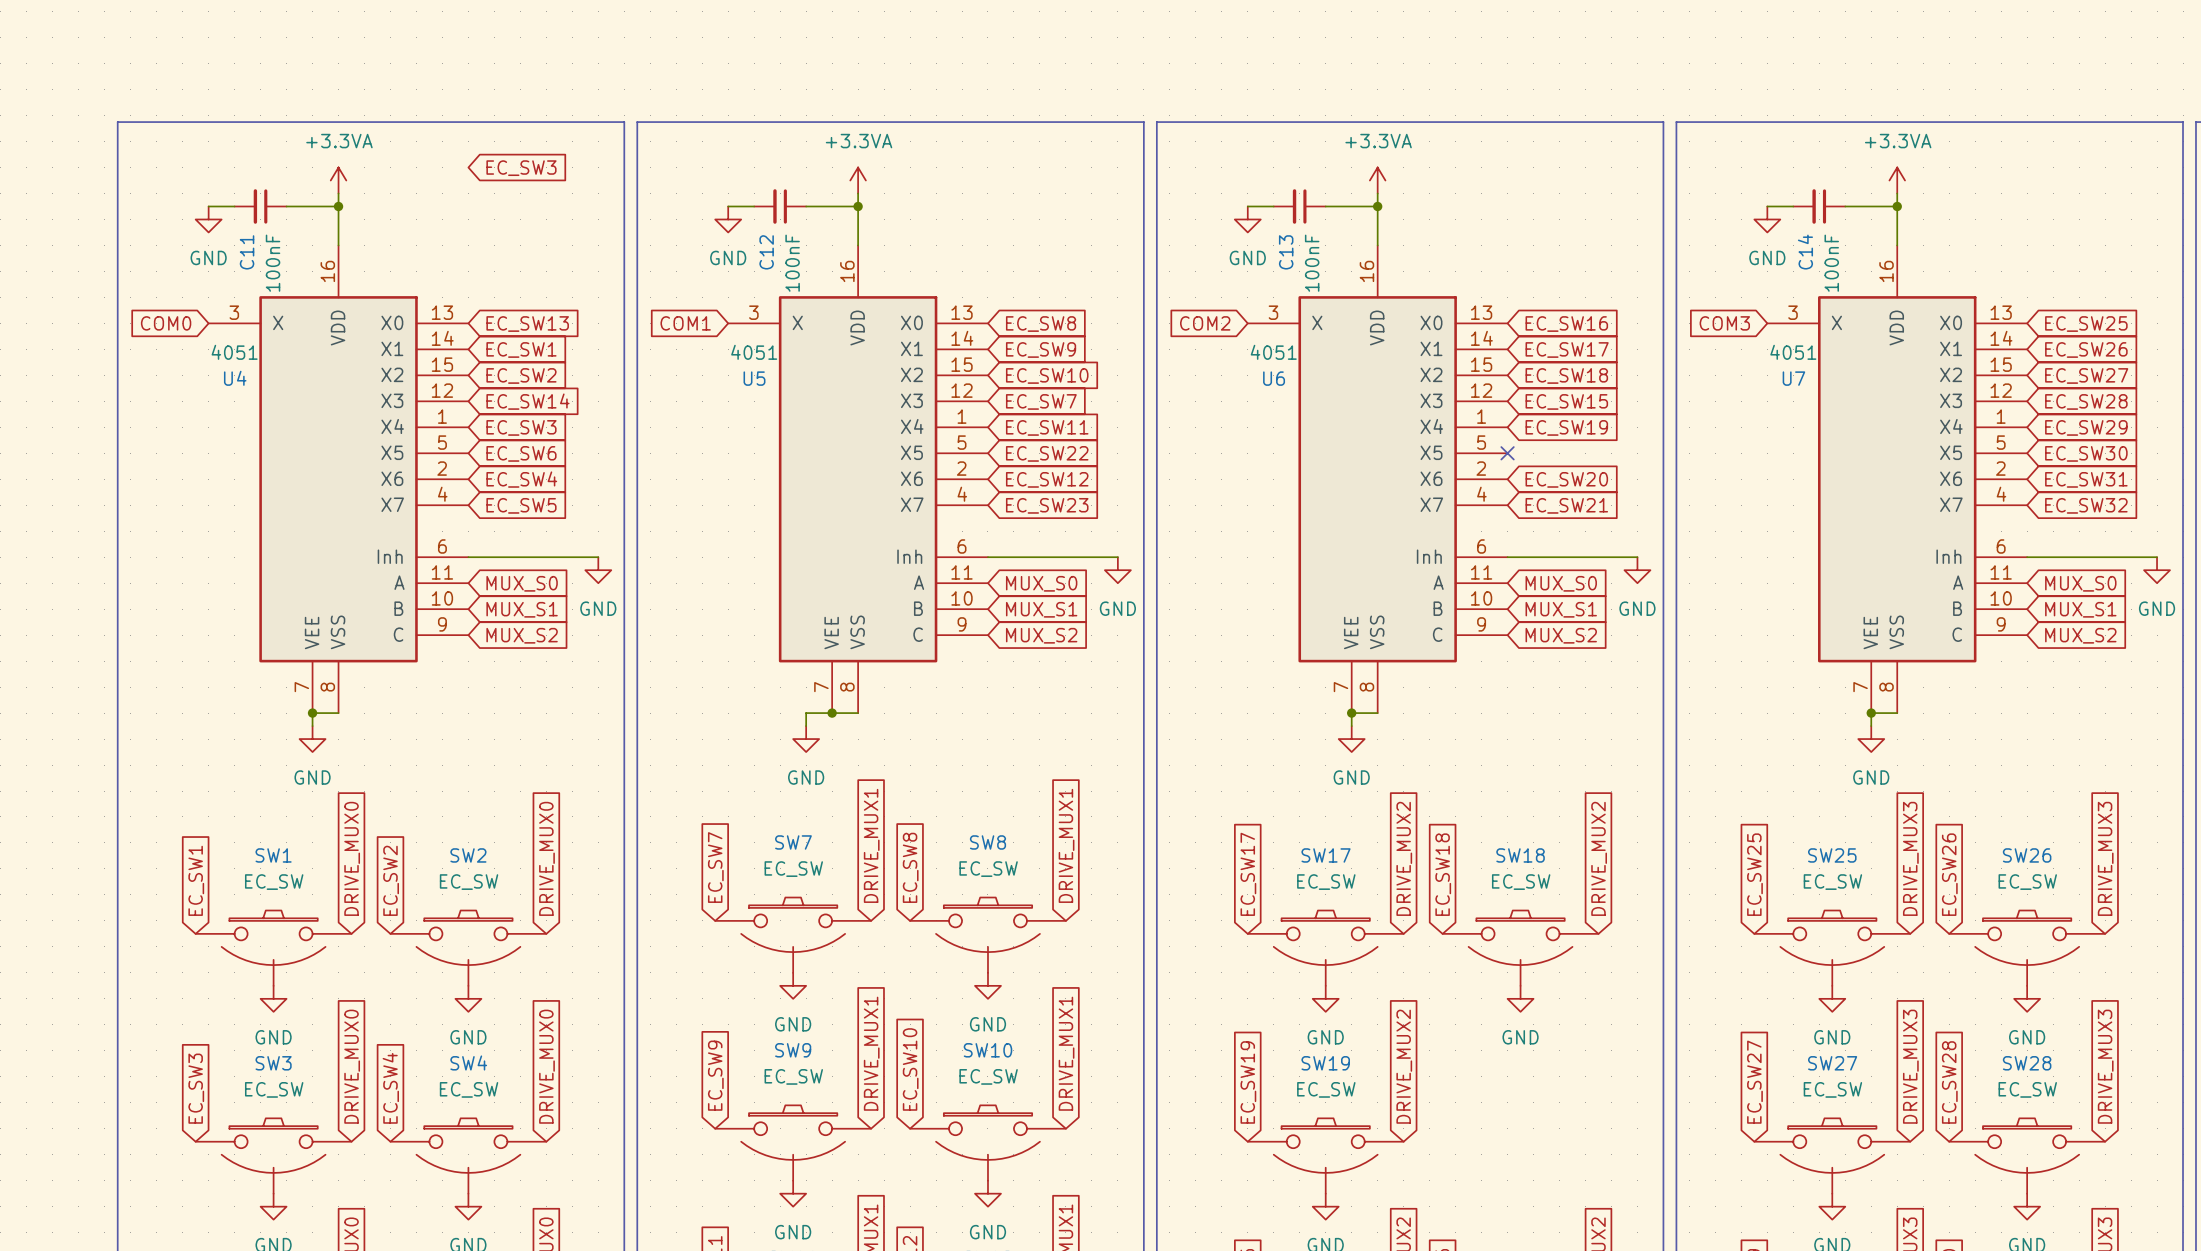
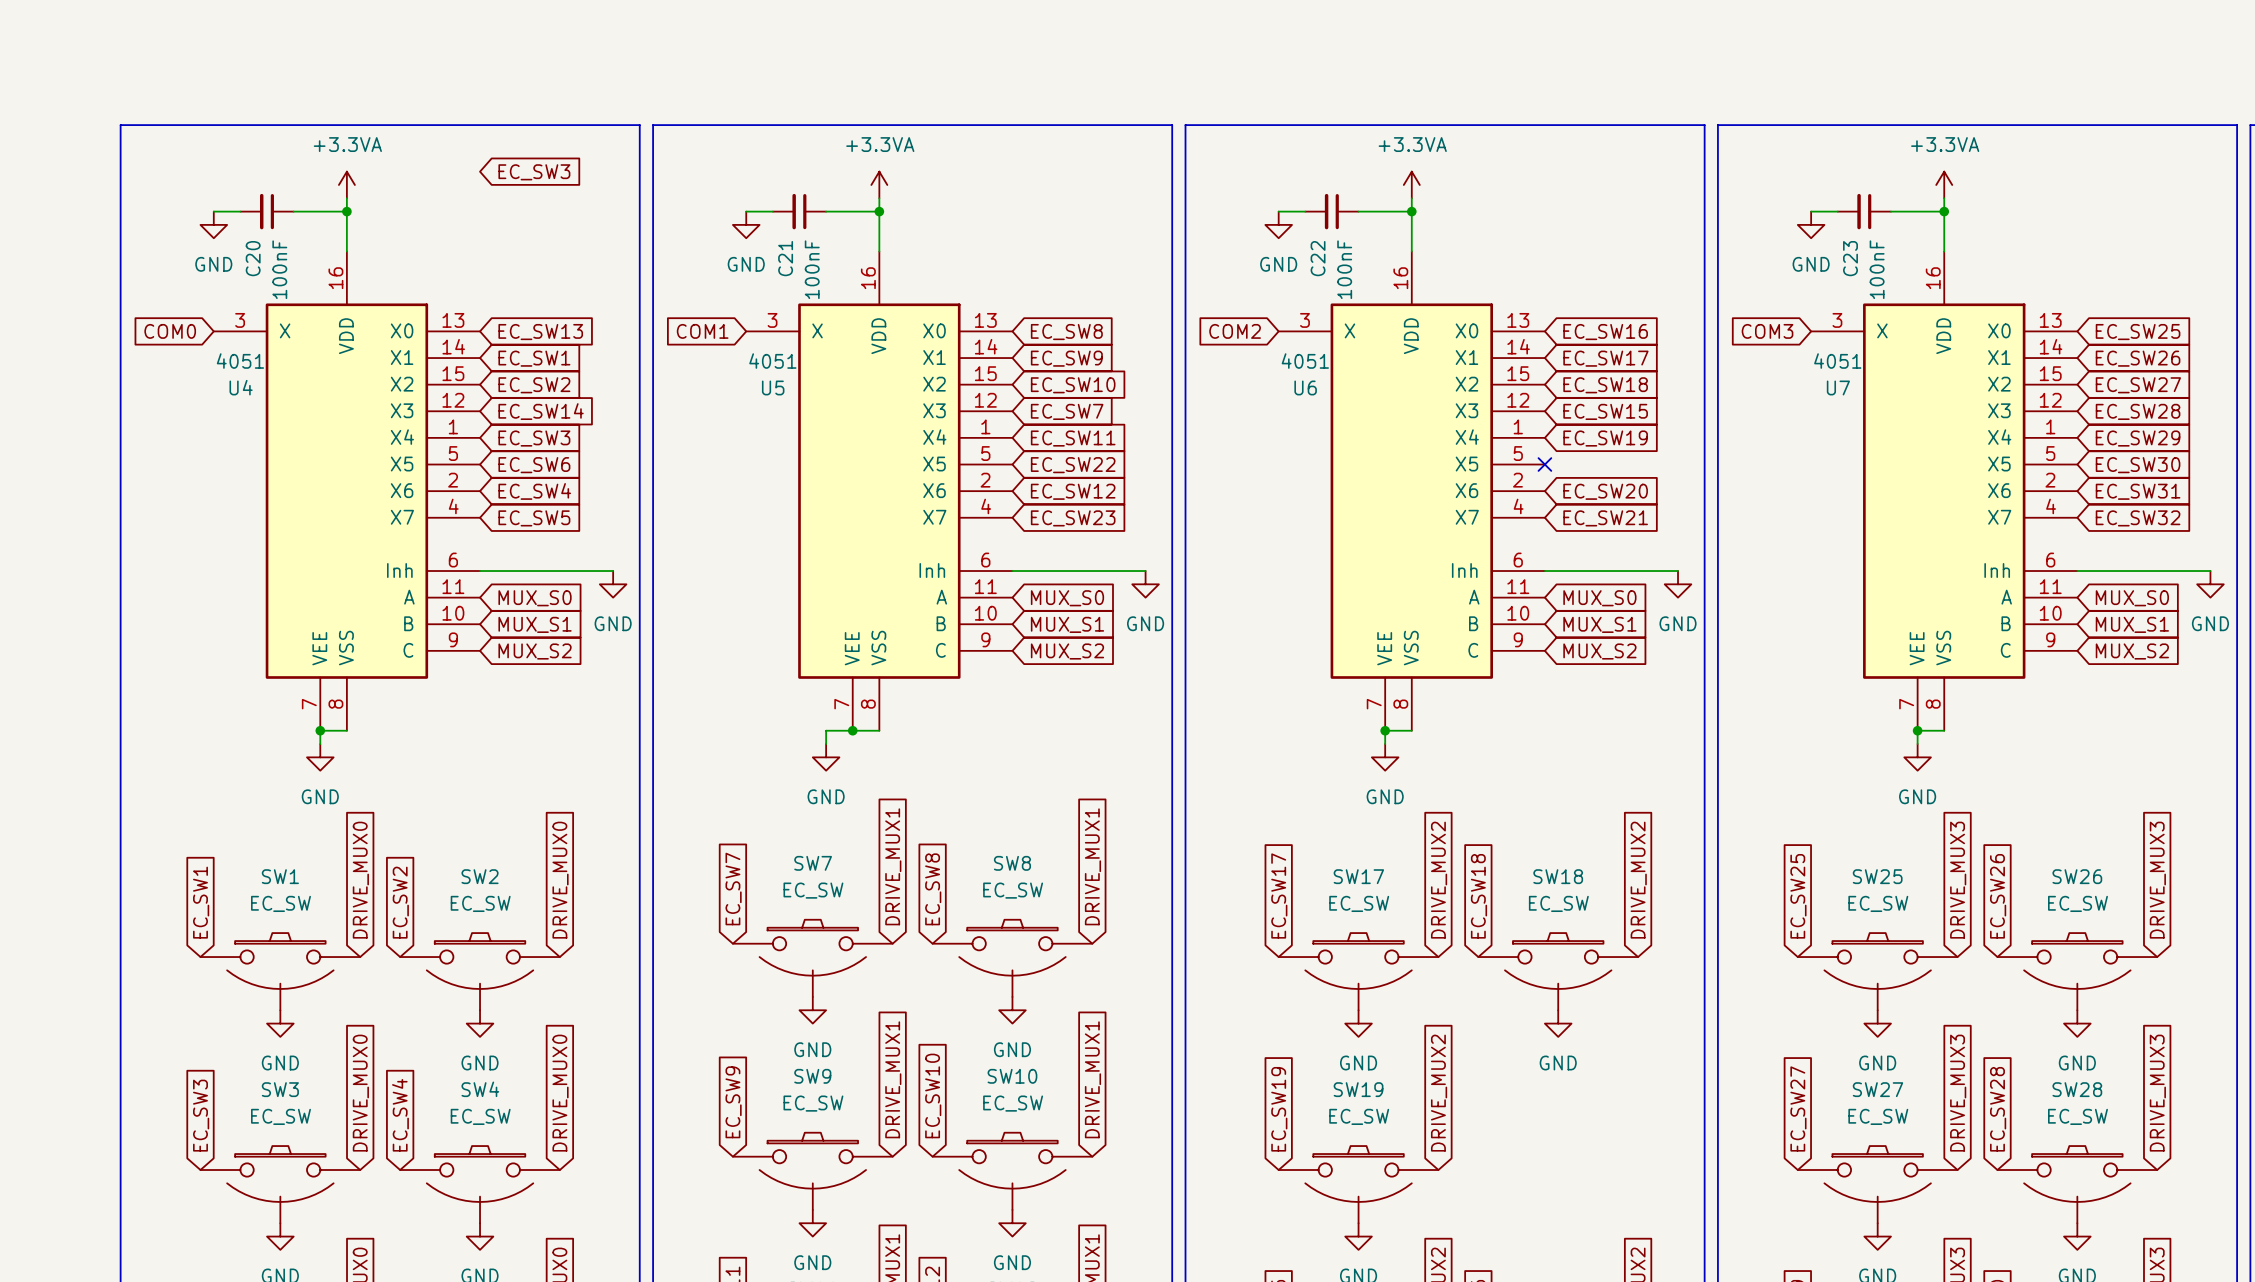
C11 name: C11 (247, 252) -> C20 (253, 258)
C12 name: C12 (766, 252) -> C21 (785, 258)
C13 name: C13 (1286, 252) -> C22 (1318, 258)
C14 name: C14 (1805, 252) -> C23 (1850, 258)

